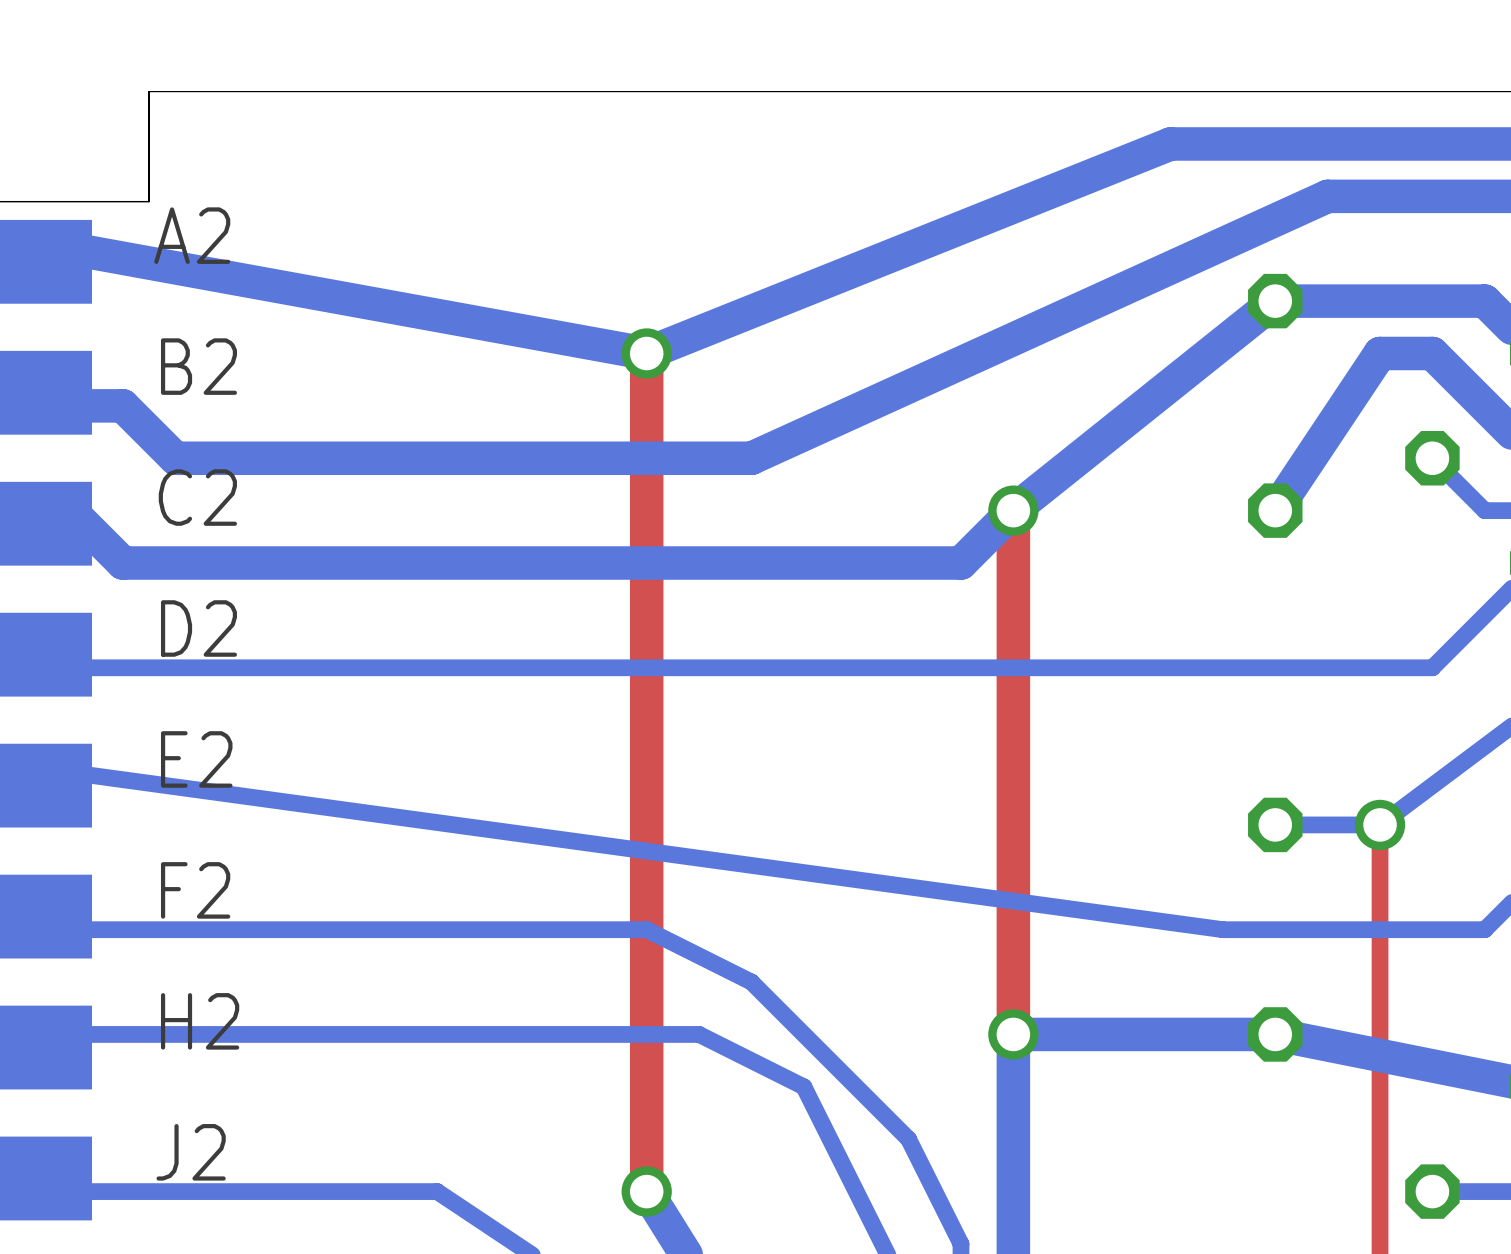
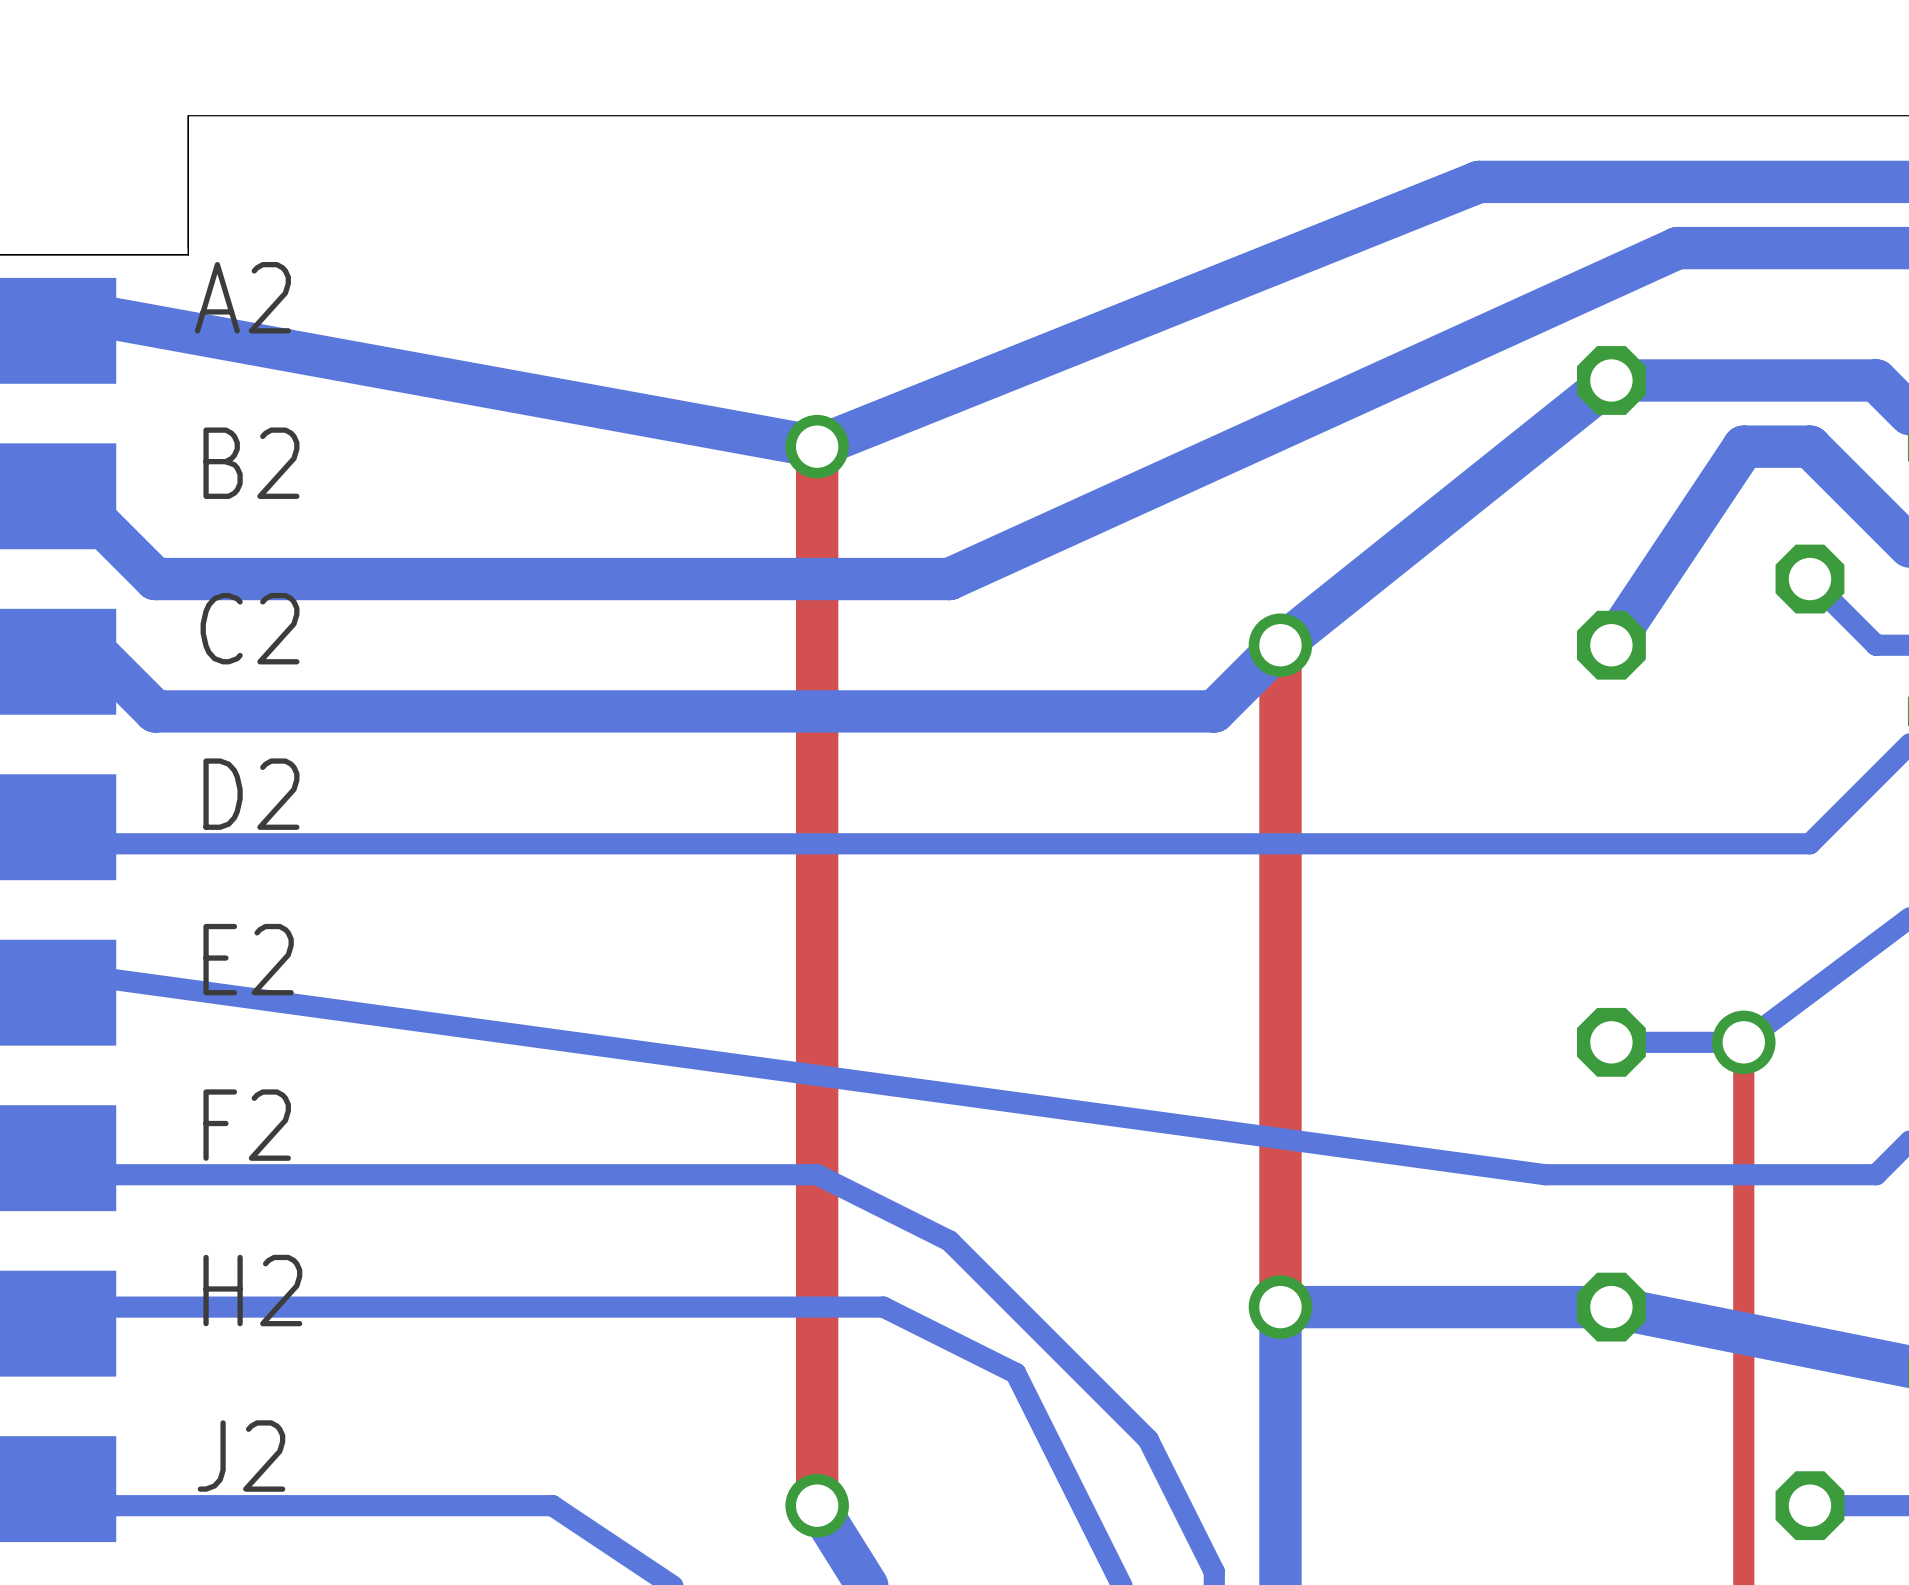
bottom track: (70, 405) (122, 405) (175, 458) -> (89, 512) (155, 579) (221, 579)

